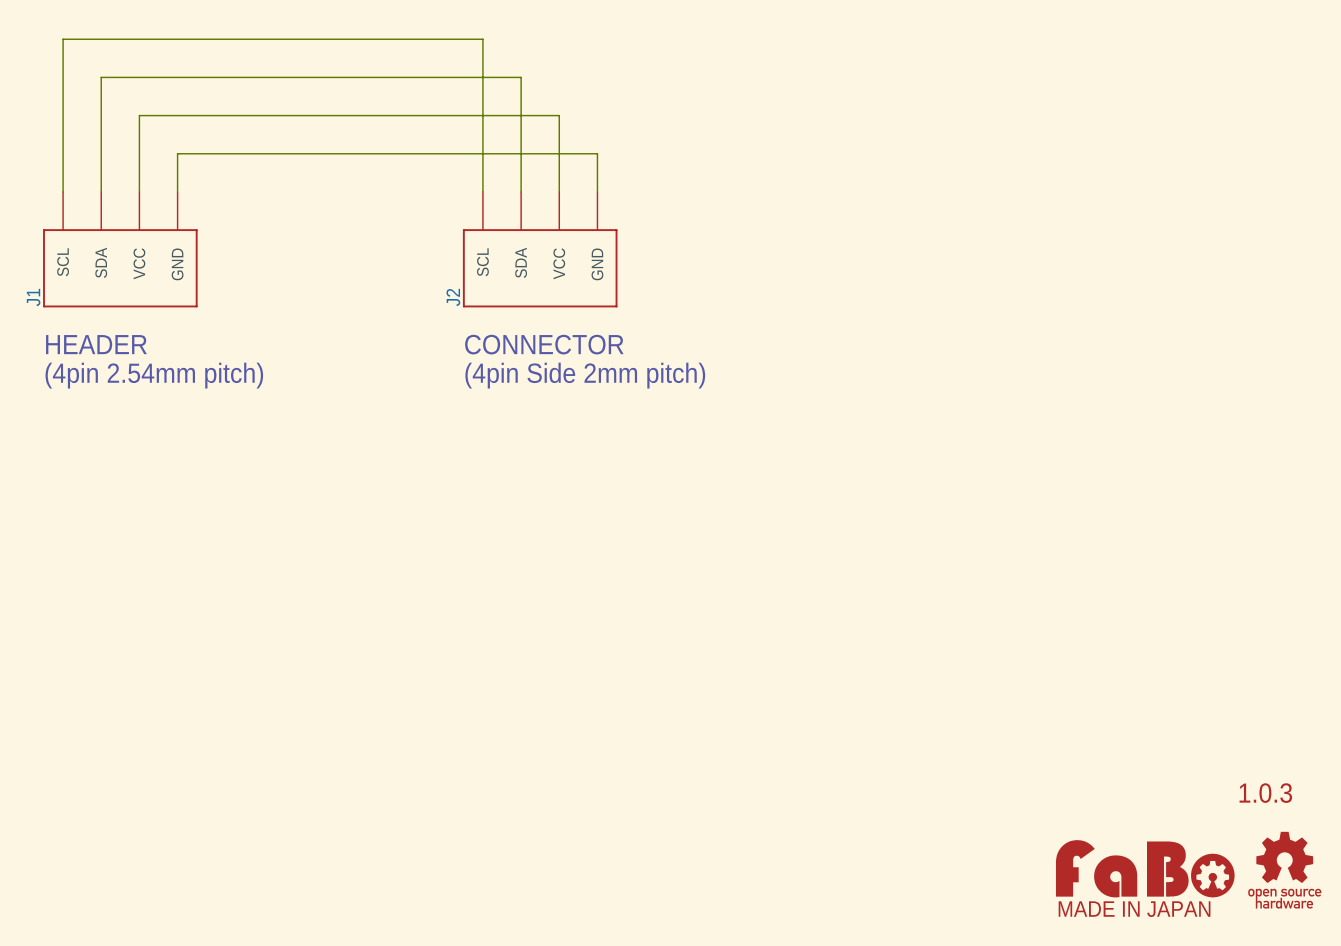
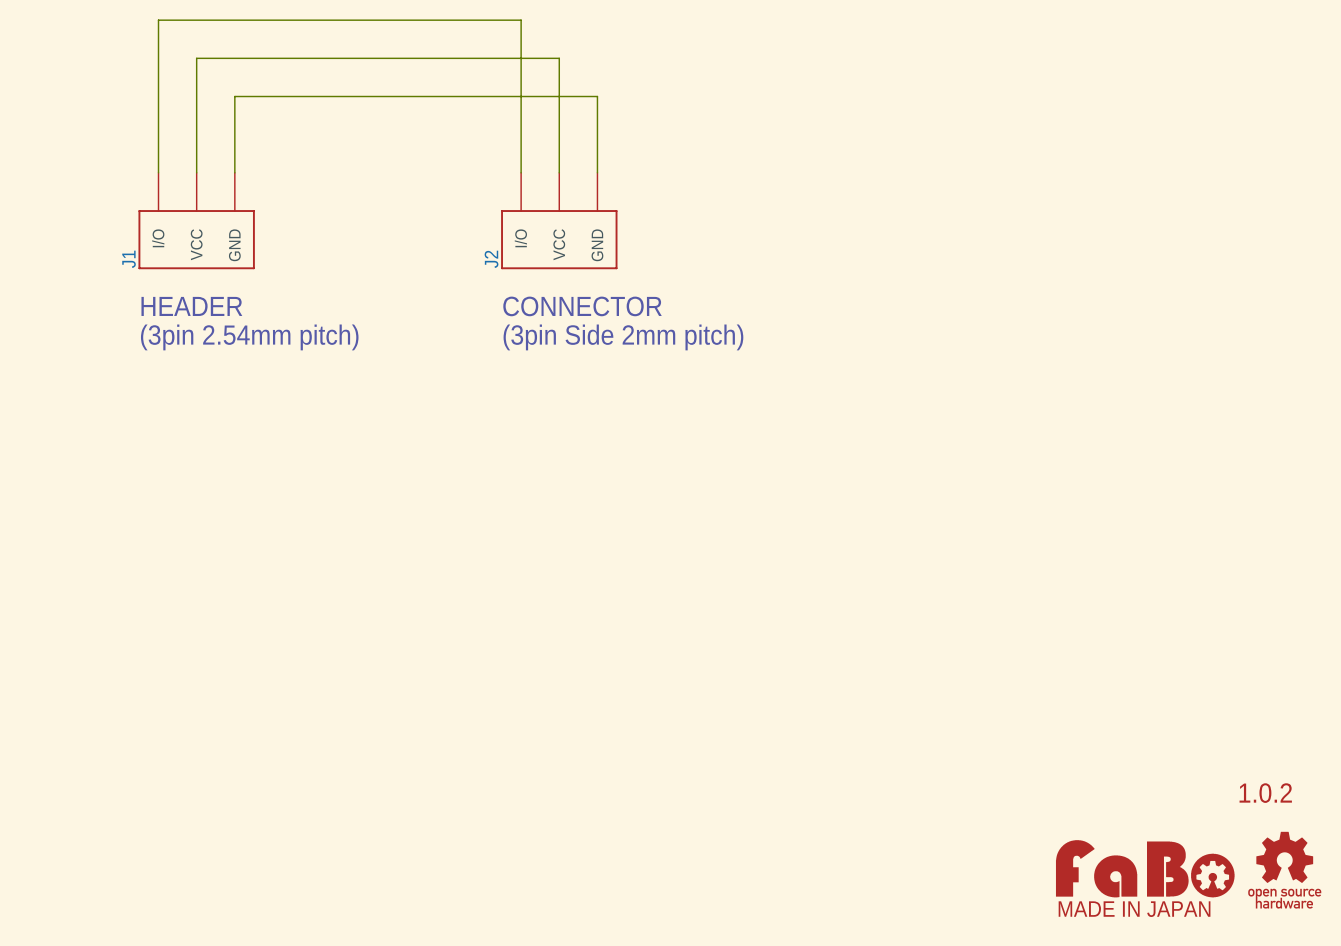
wire: (521, 77) (101, 77) (101, 191) -> (521, 77) (521, 20) (158, 20) (158, 172)
wire: (559, 115) (139, 115) (139, 191) -> (559, 115) (559, 58) (196, 58) (196, 172)
wire: (597, 153) (177, 153) (177, 191) -> (597, 153) (597, 96) (234, 96) (234, 172)
J1 symbol: [43, 191, 198, 308] -> [138, 172, 255, 270]
wire: (63, 191) (63, 39) (482, 39) (482, 191) -> none
J2 symbol: [462, 191, 618, 308] -> [501, 172, 618, 270]
J1 name position: J1 (33, 297) -> J1 (129, 259)
J2 name position: J2 (453, 297) -> J2 (491, 259)
text position: HEADER (96, 344) -> HEADER (191, 306)
text position: CONNECTOR (544, 344) -> CONNECTOR (582, 306)
text: (4pin 2.54mm pitch) (154, 375) -> (3pin 2.54mm pitch) (249, 337)
text: (4pin Side 2mm pitch) (585, 375) -> (3pin Side 2mm pitch) (623, 337)
text: 1.0.3 (1265, 793) -> 1.0.2 (1265, 793)

